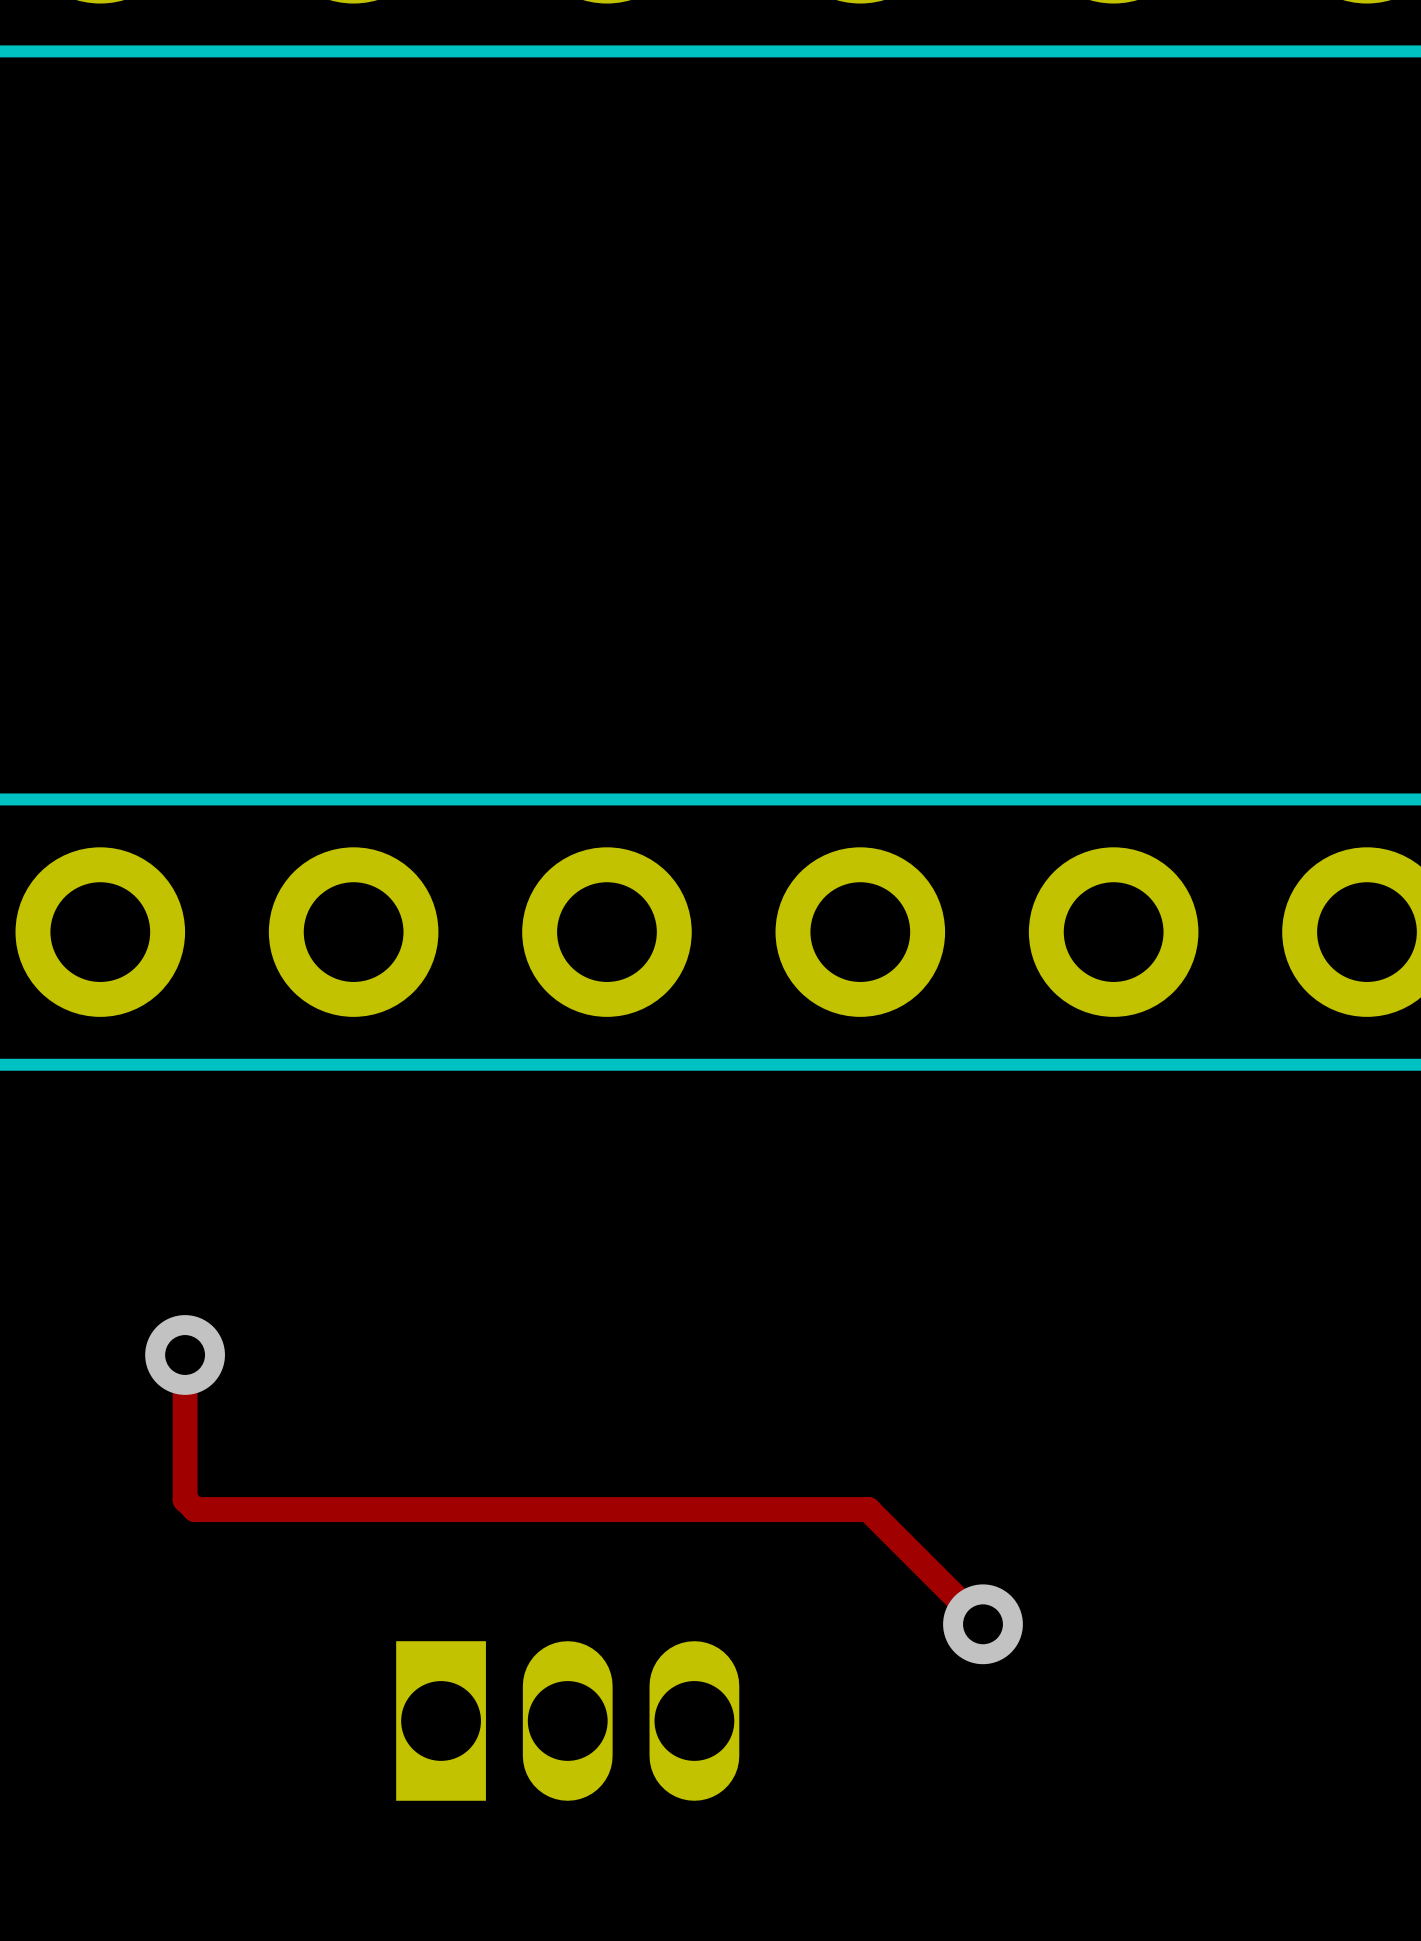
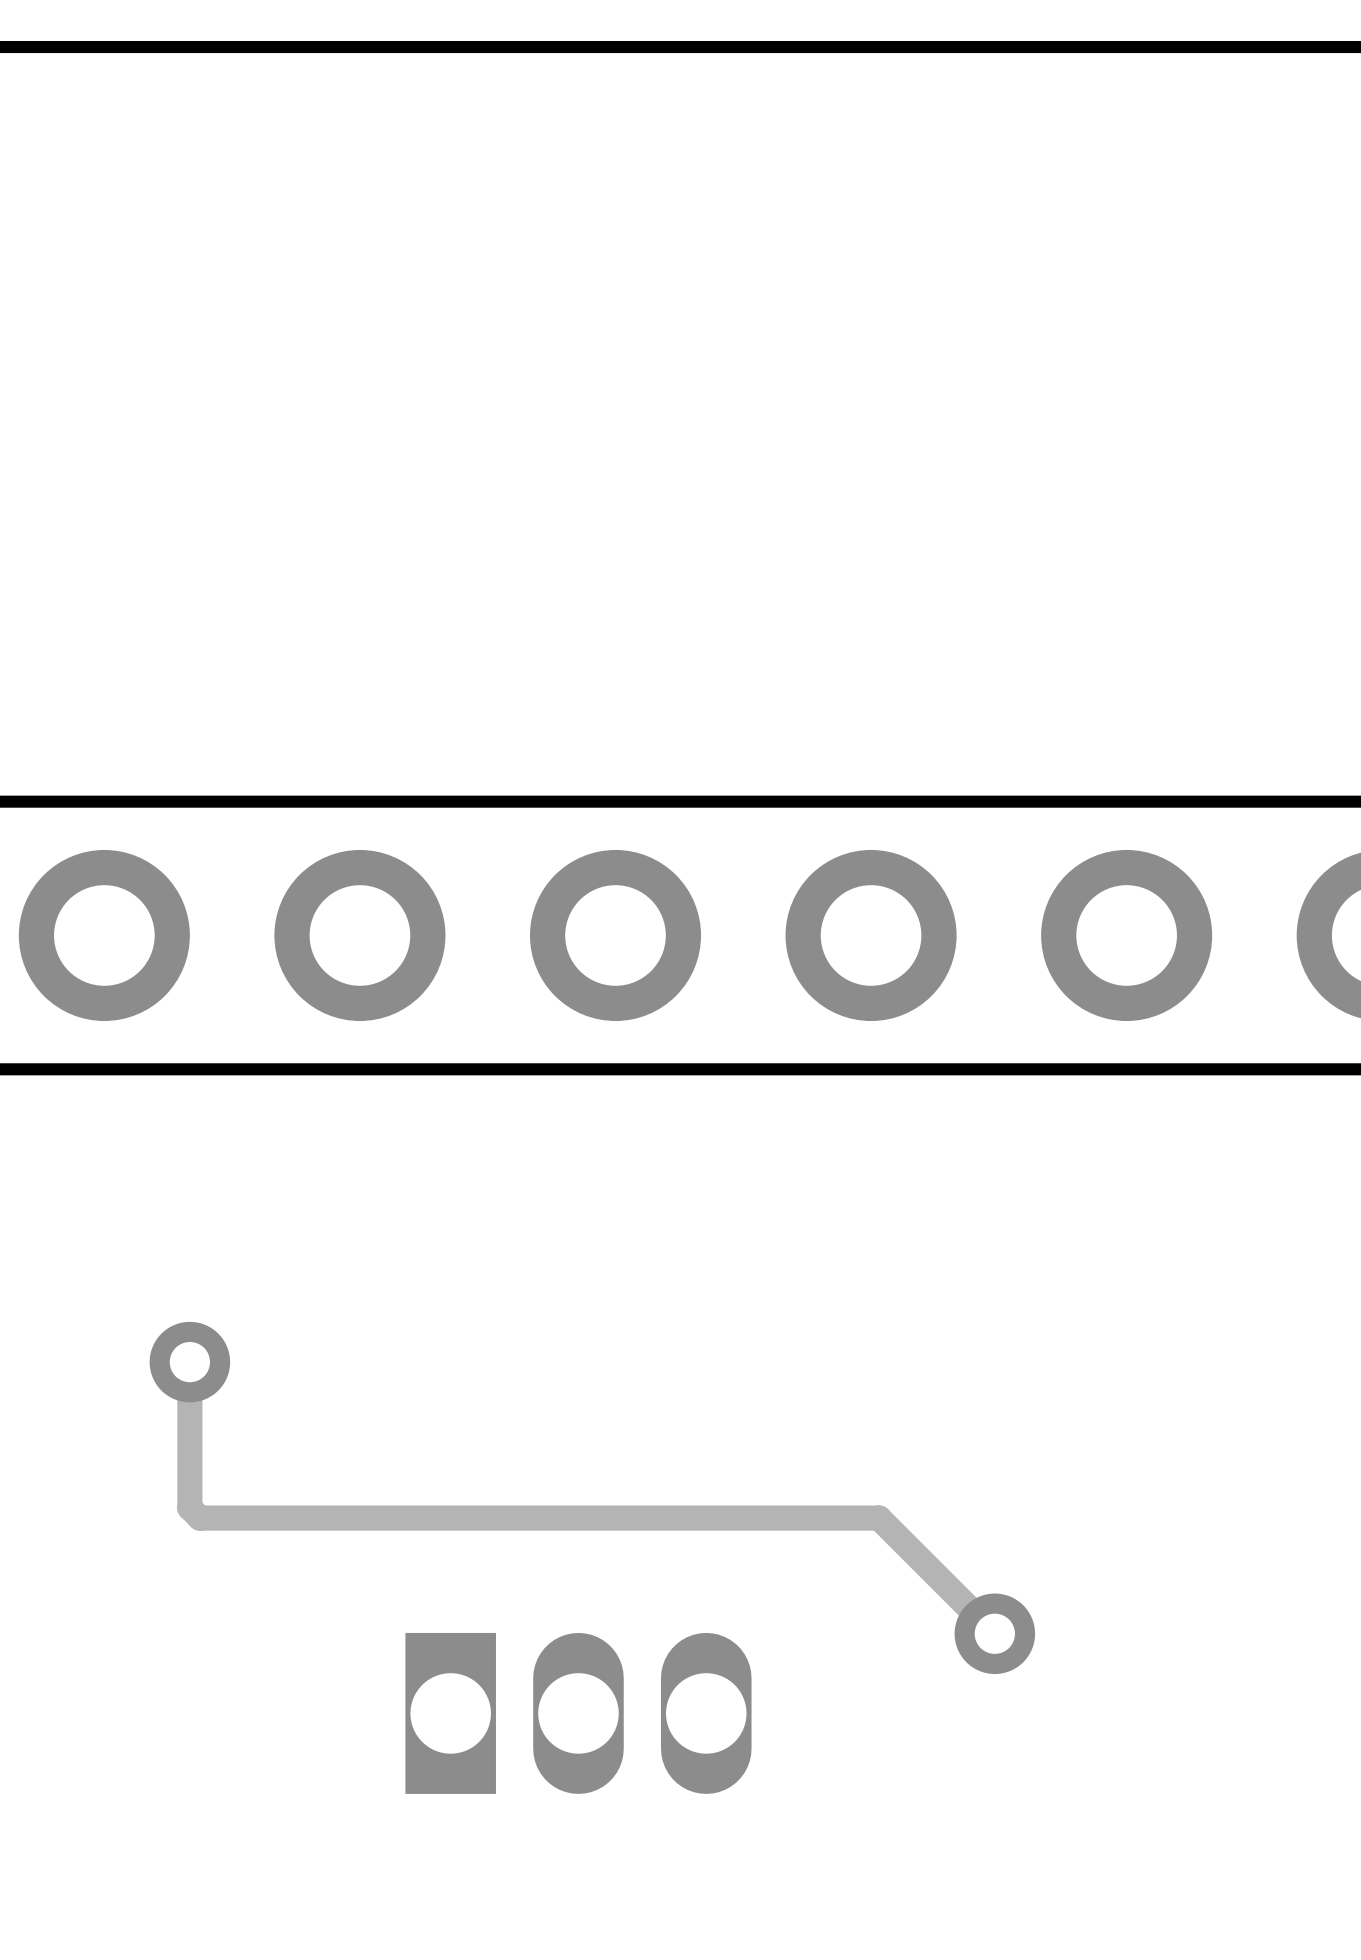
part position: (567, 1720) -> (578, 1713)

